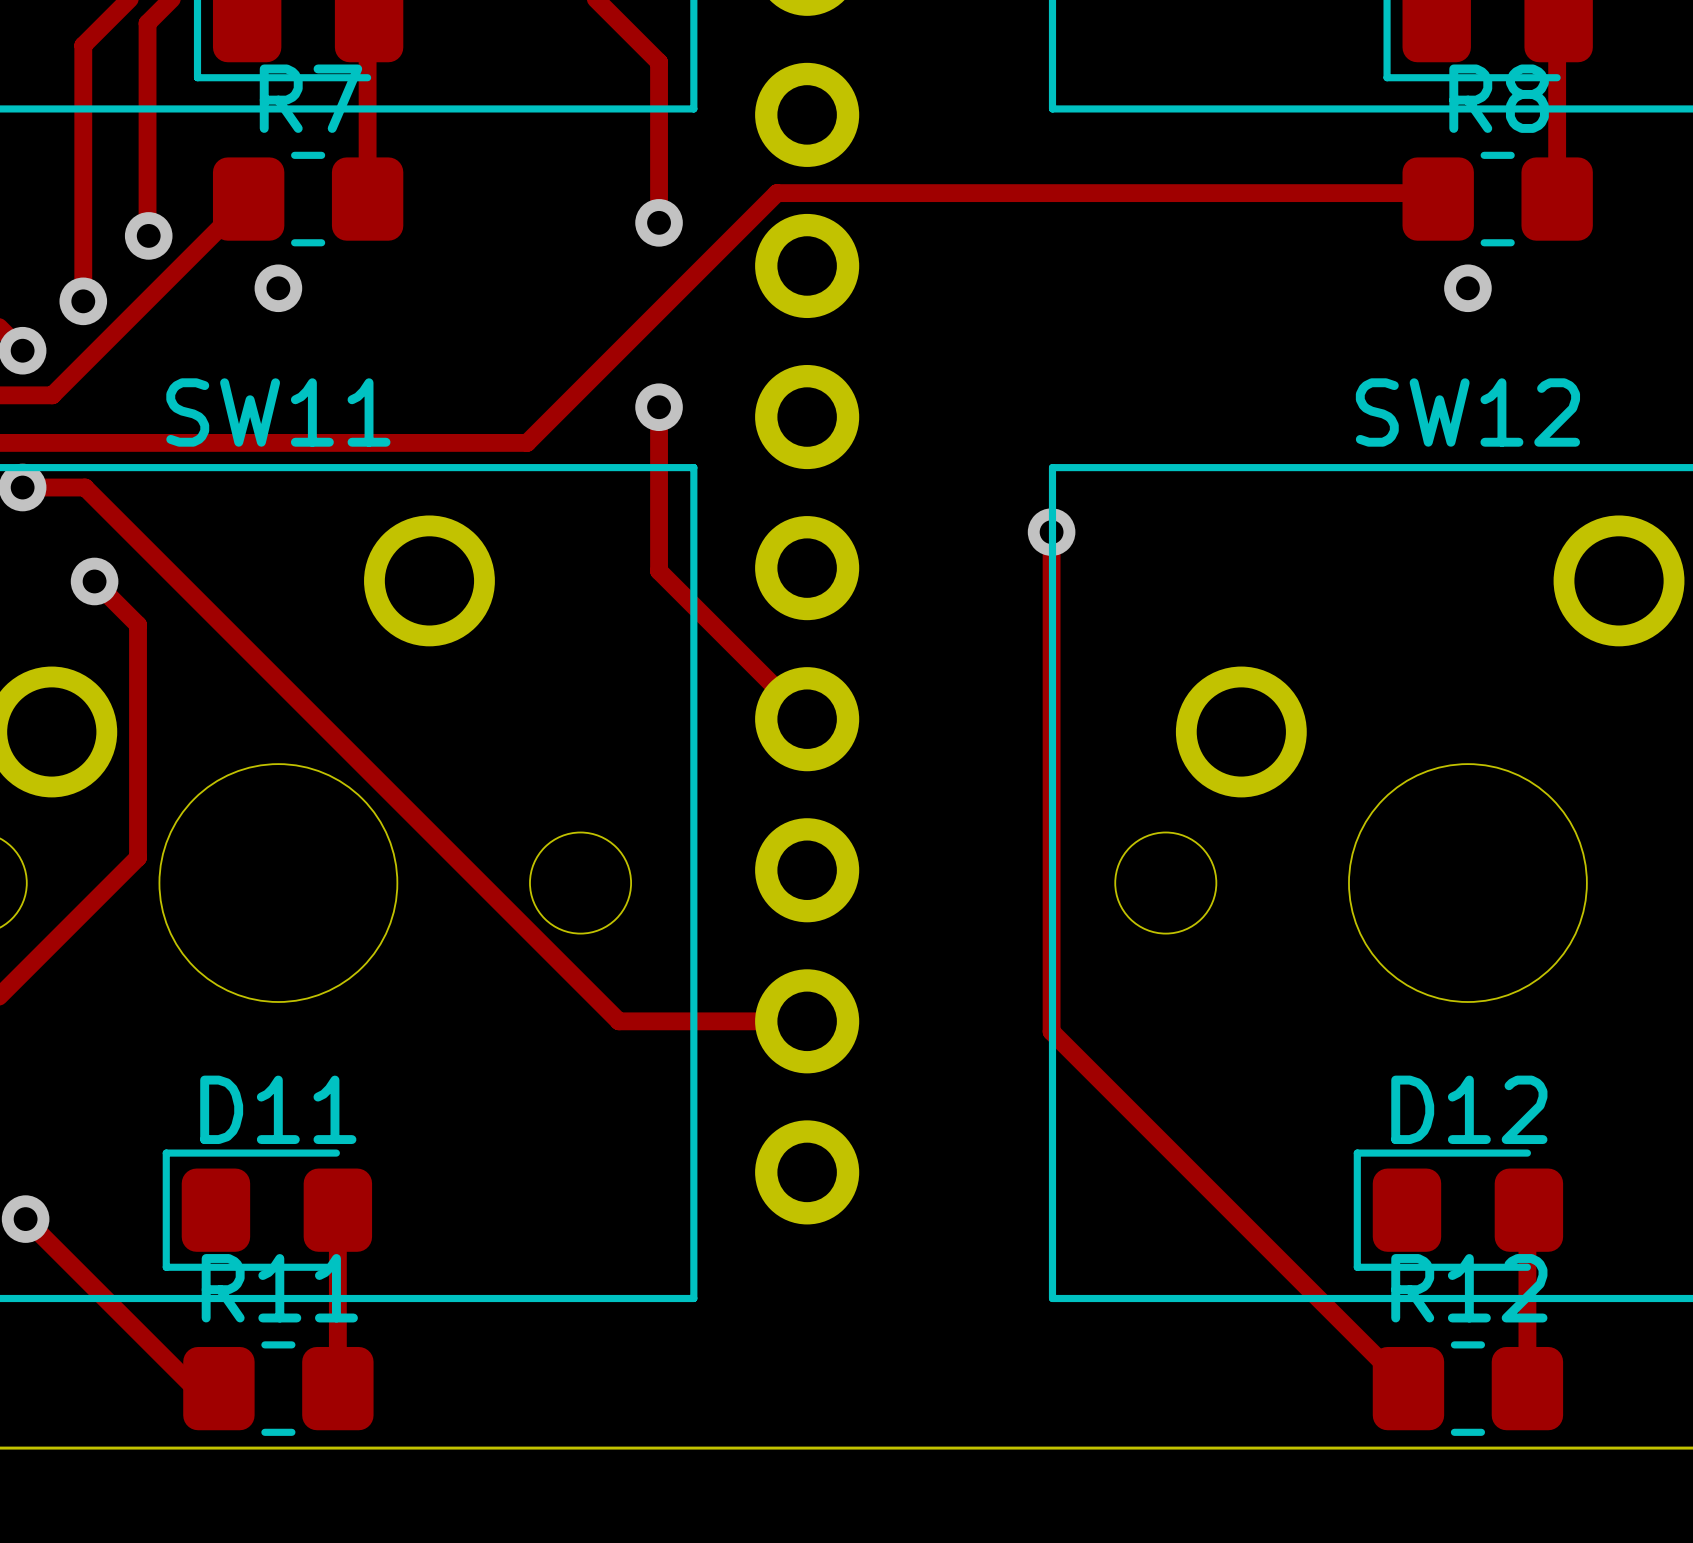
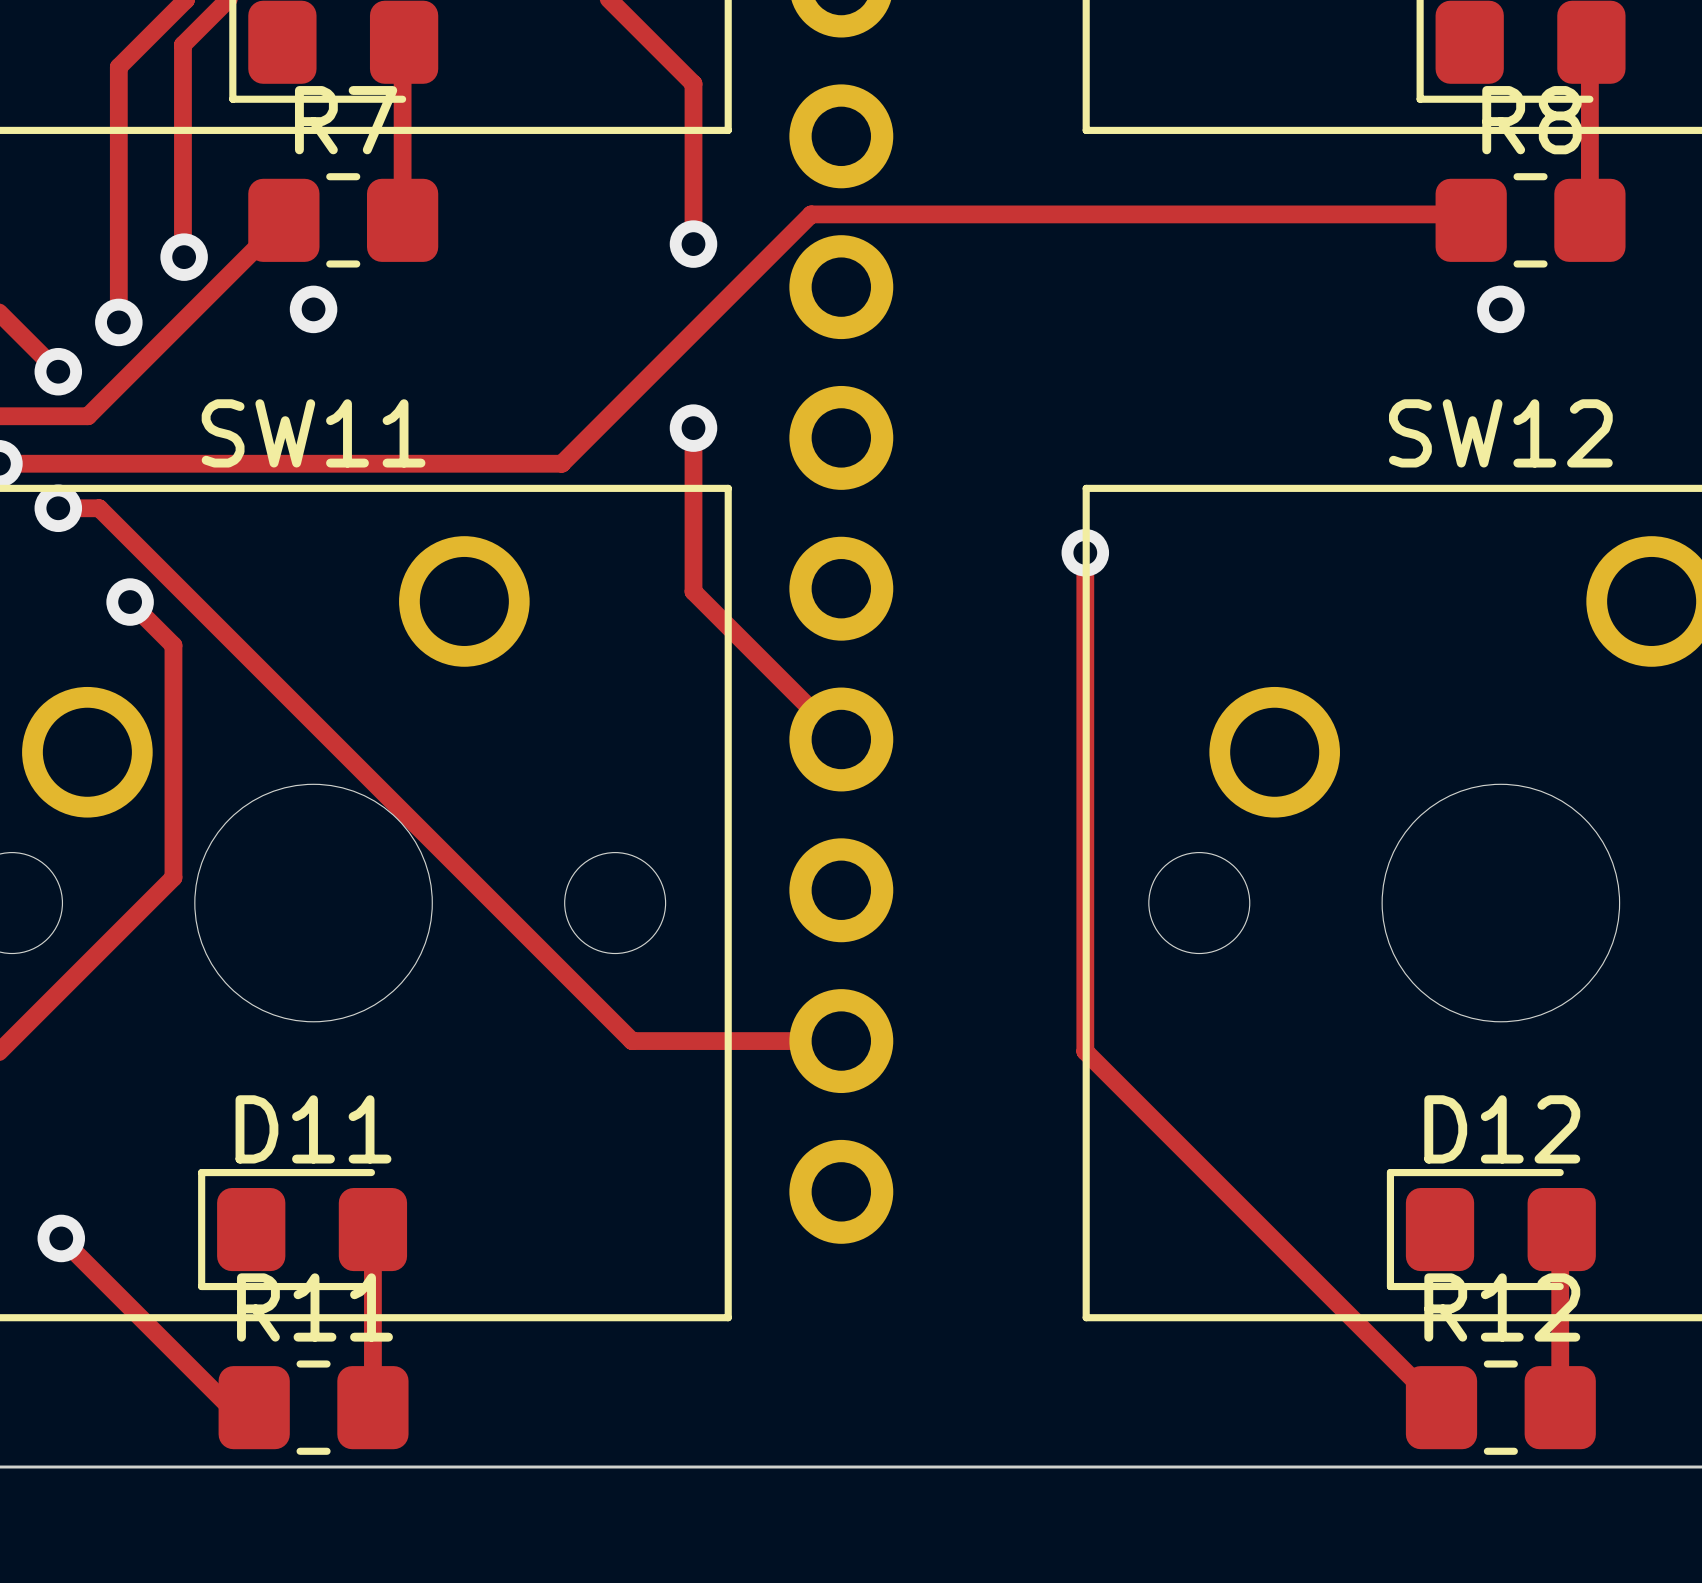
track: (63, 487) (85, 487) (618, 1021) -> (99, 508) (632, 1041) (653, 1041)

